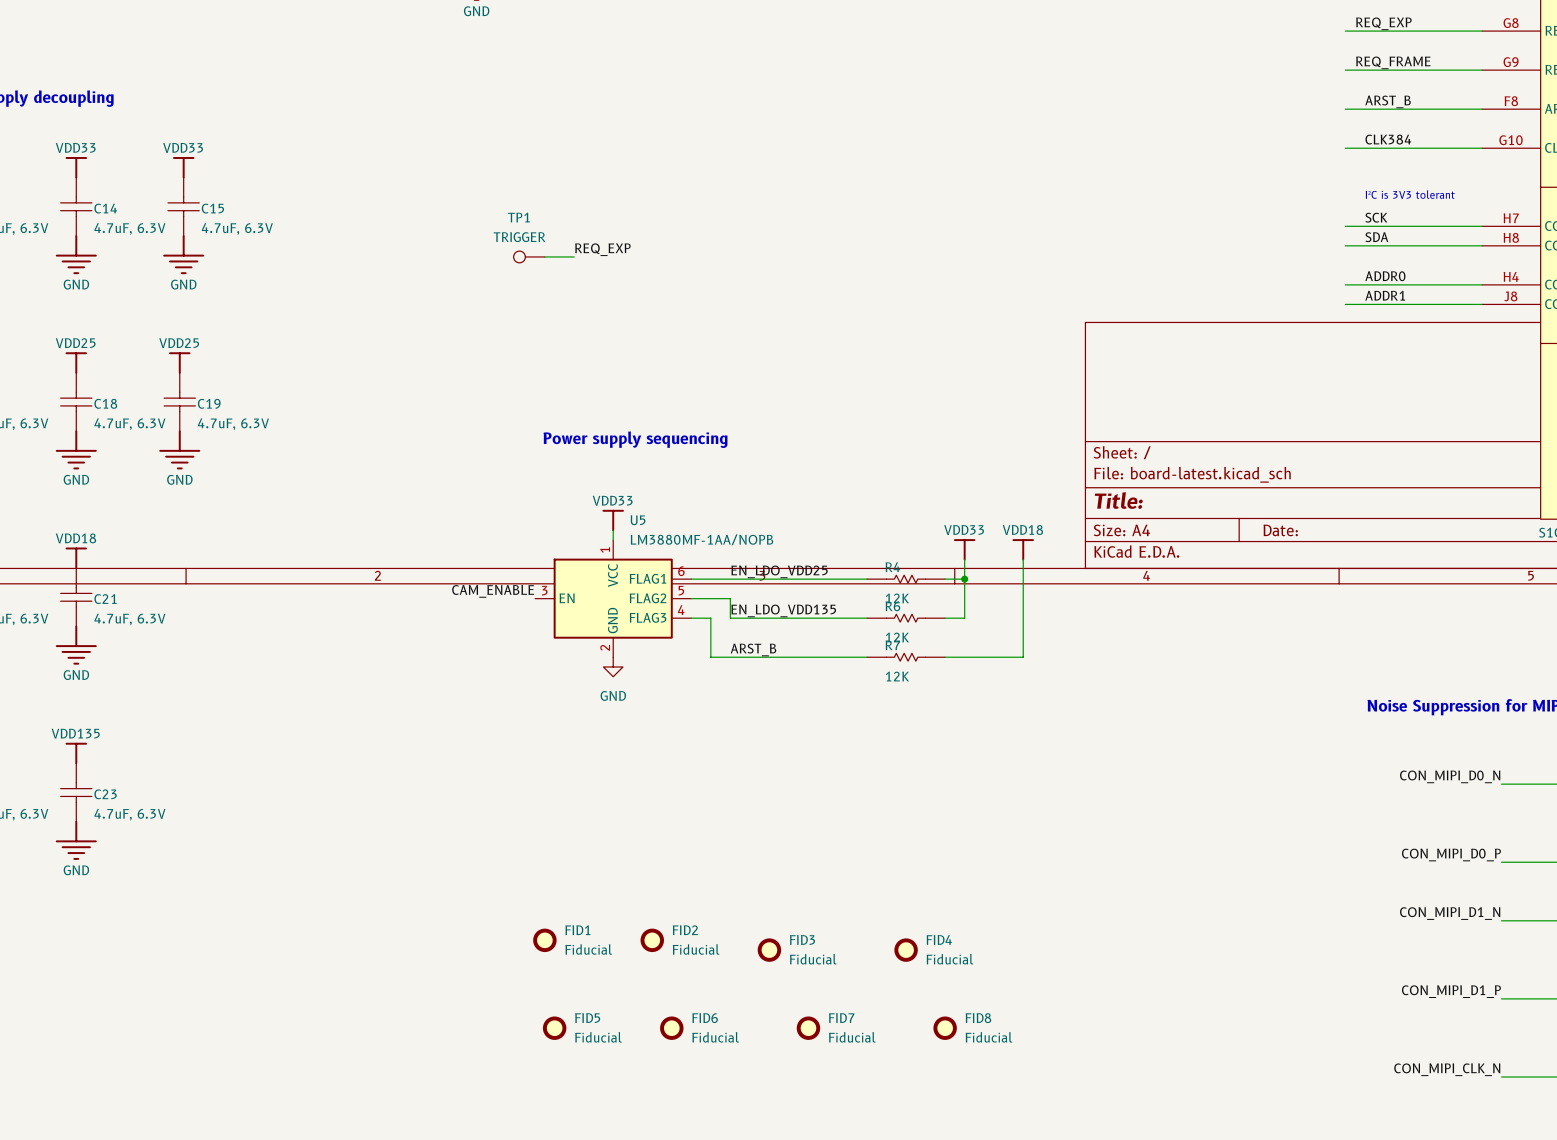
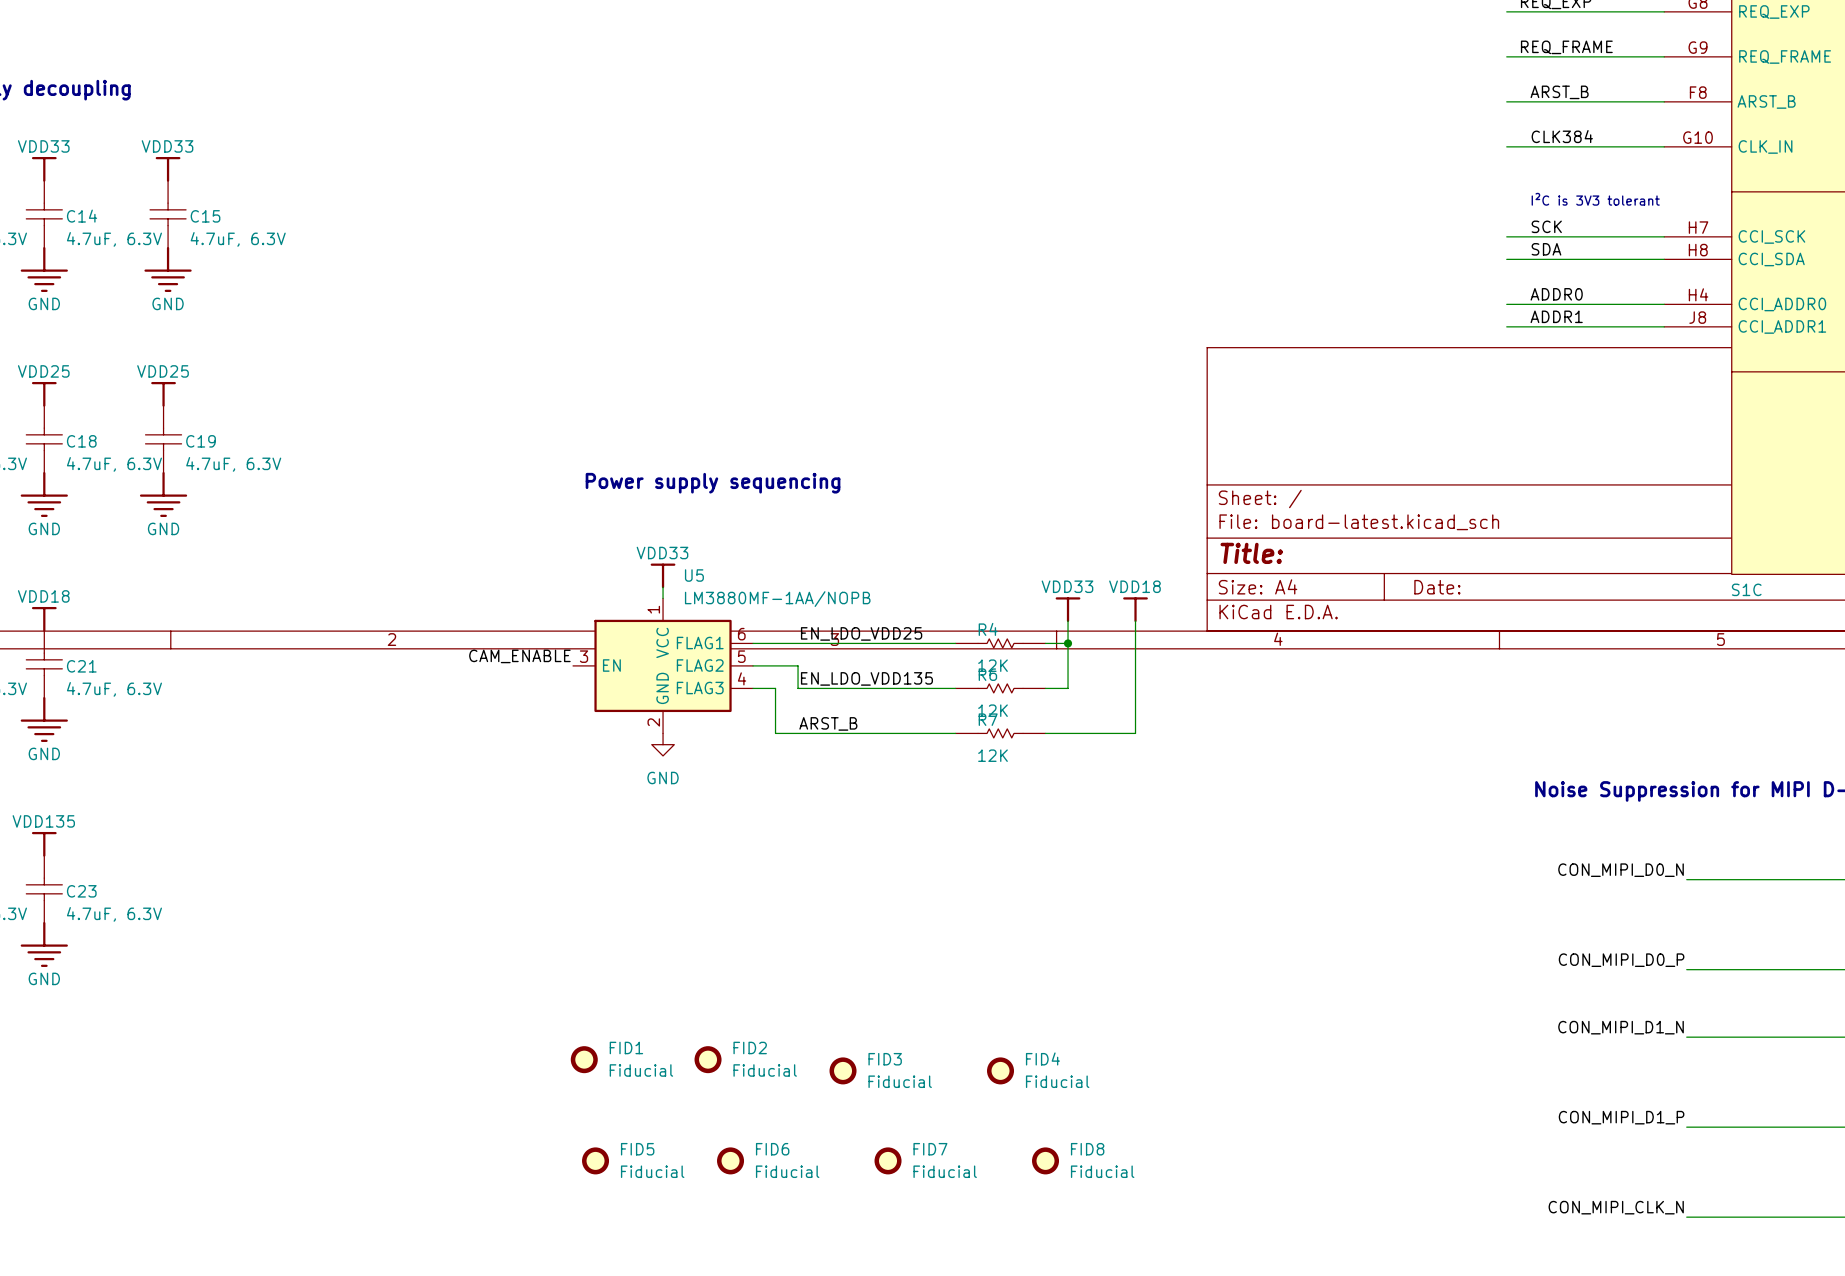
label: REQ_EXP (602, 249) -> none
TP1: TRIGGER (529, 256) -> none
wire: (544, 256) (574, 256) -> none

